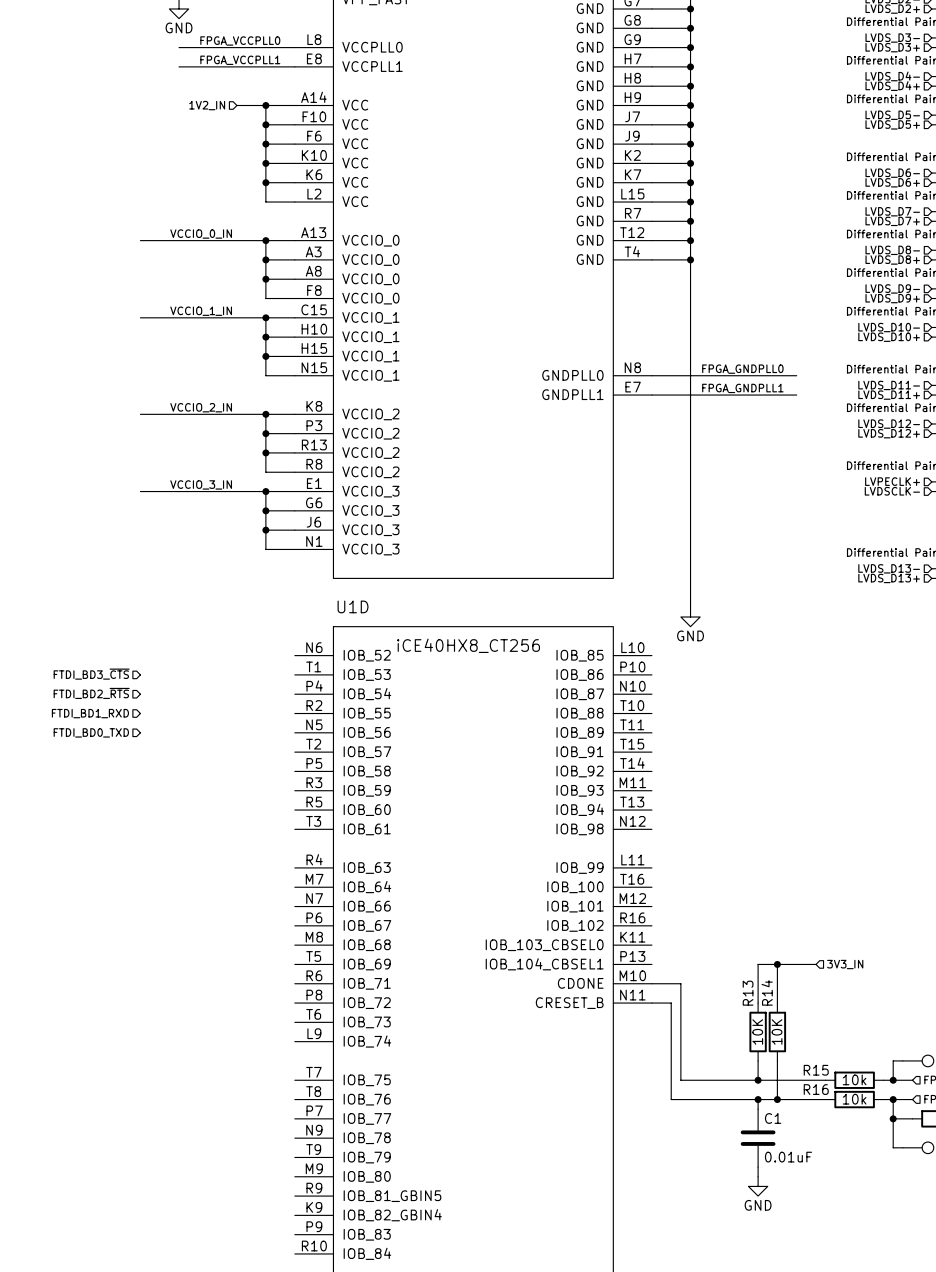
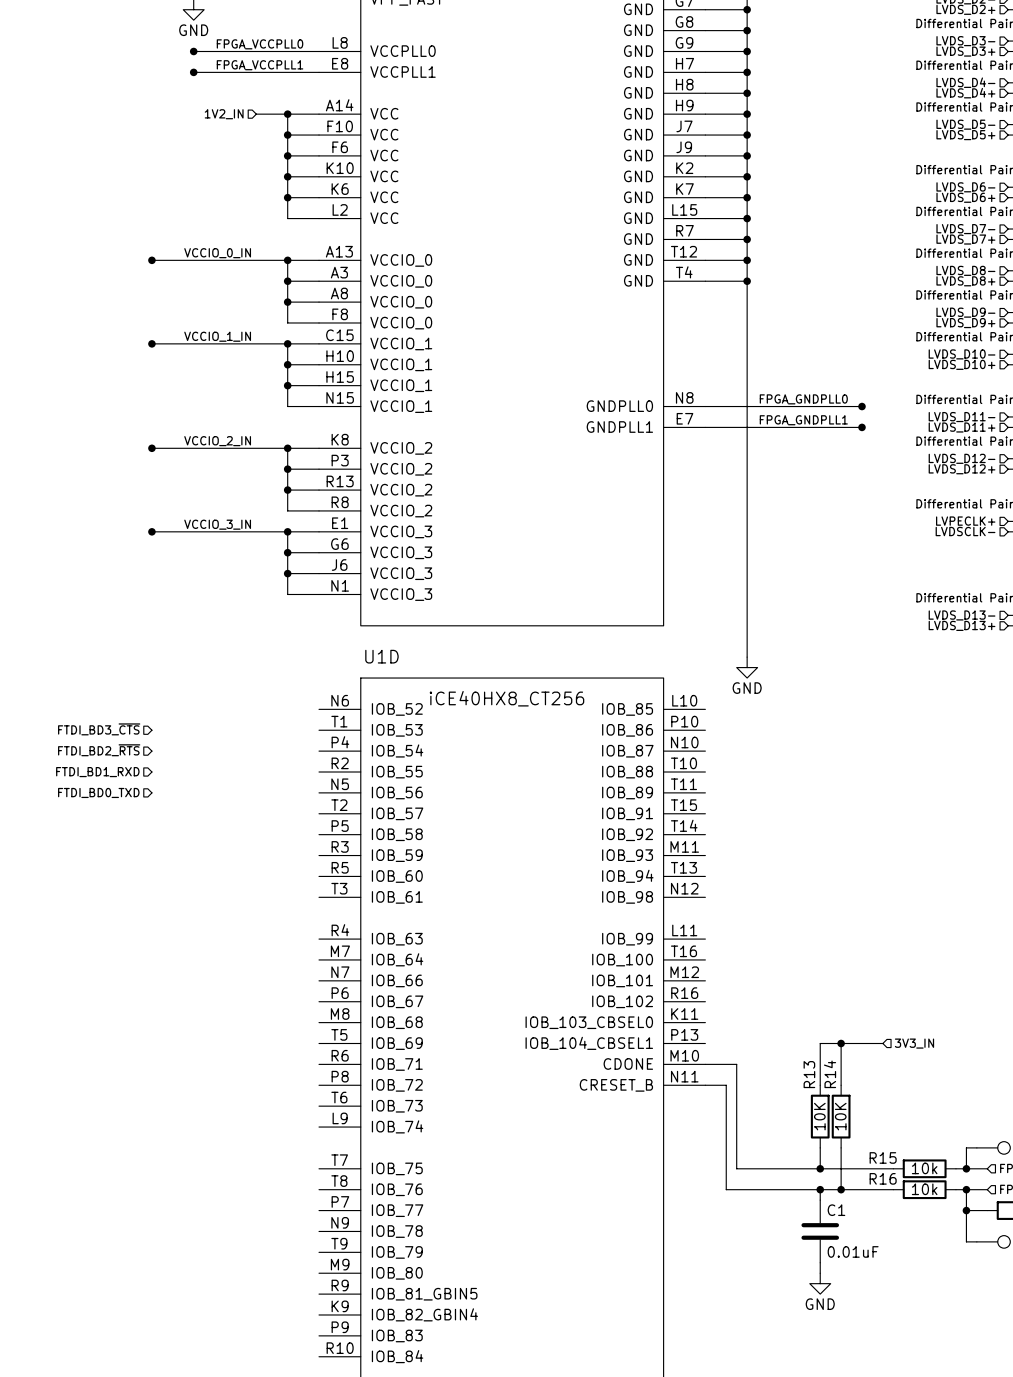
junction: none -> (193, 51)
junction: none -> (193, 72)
junction: none -> (151, 260)
junction: none -> (151, 343)
junction: none -> (862, 406)
junction: none -> (862, 427)
junction: none -> (151, 448)
junction: none -> (151, 531)

